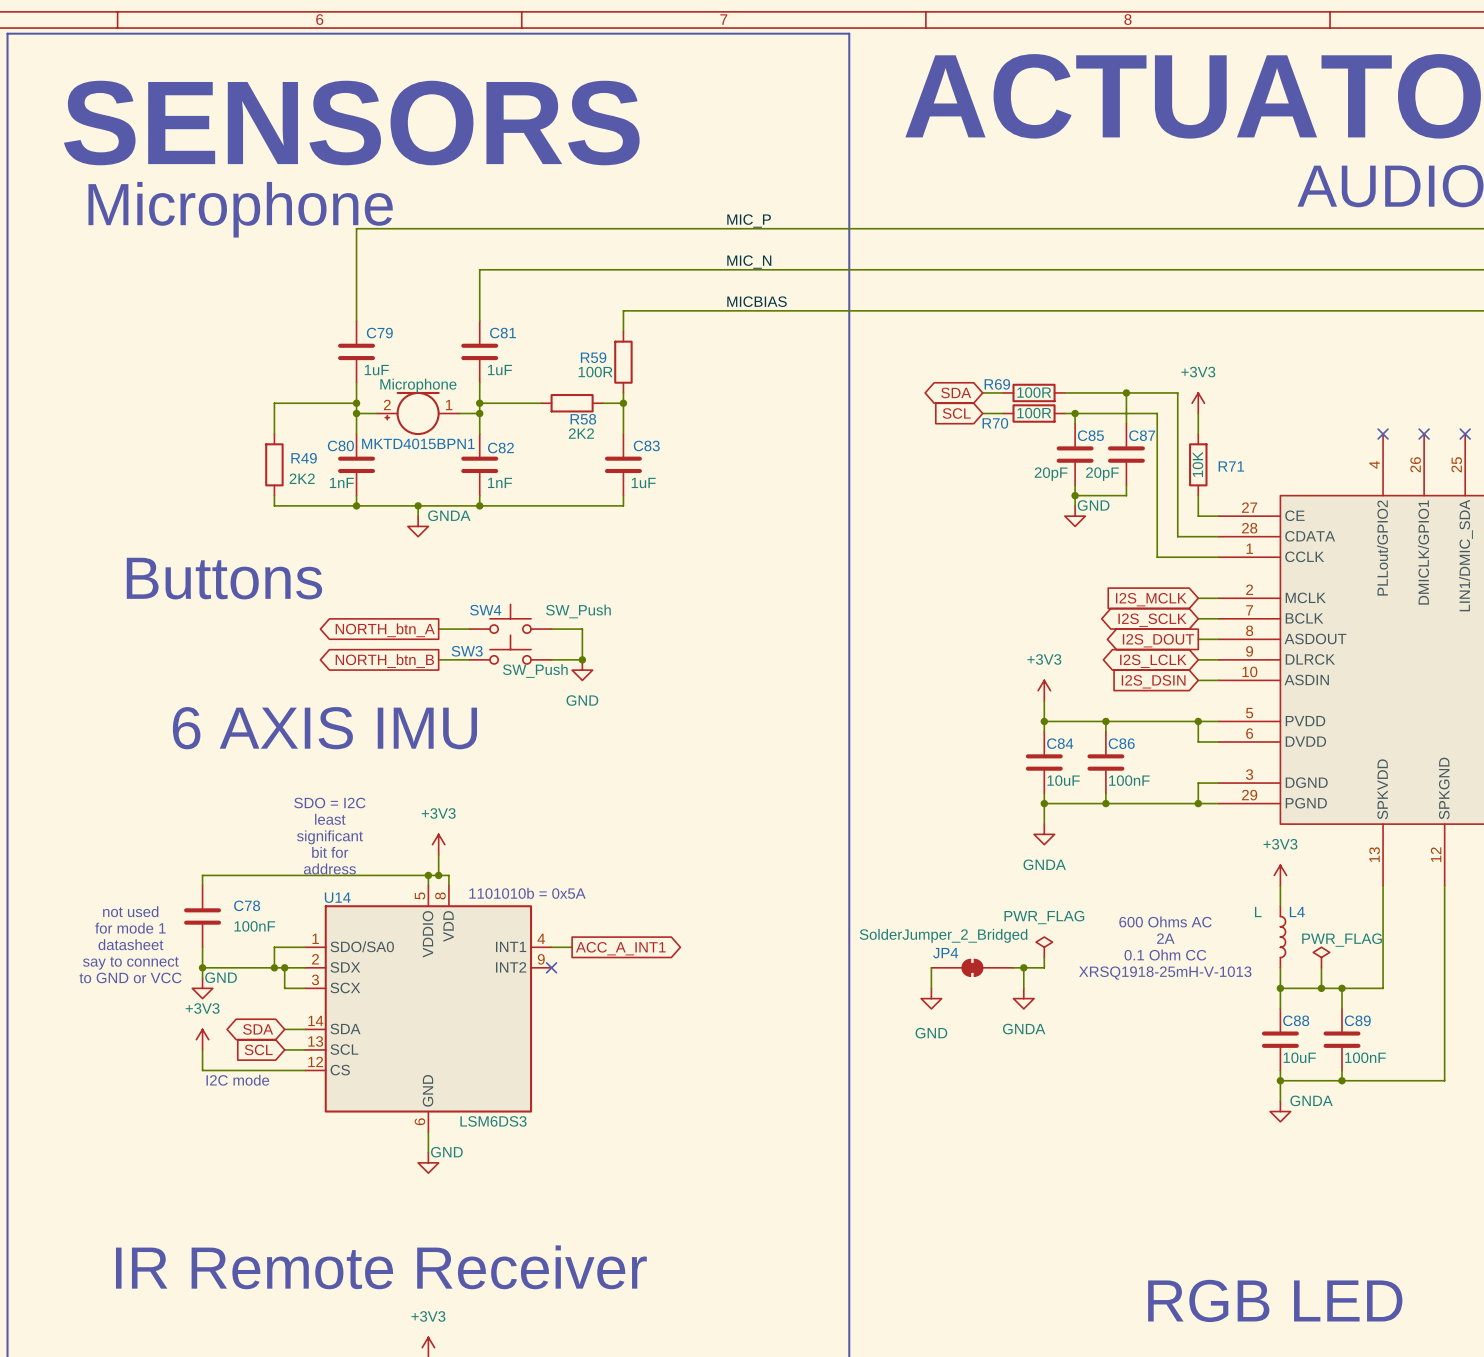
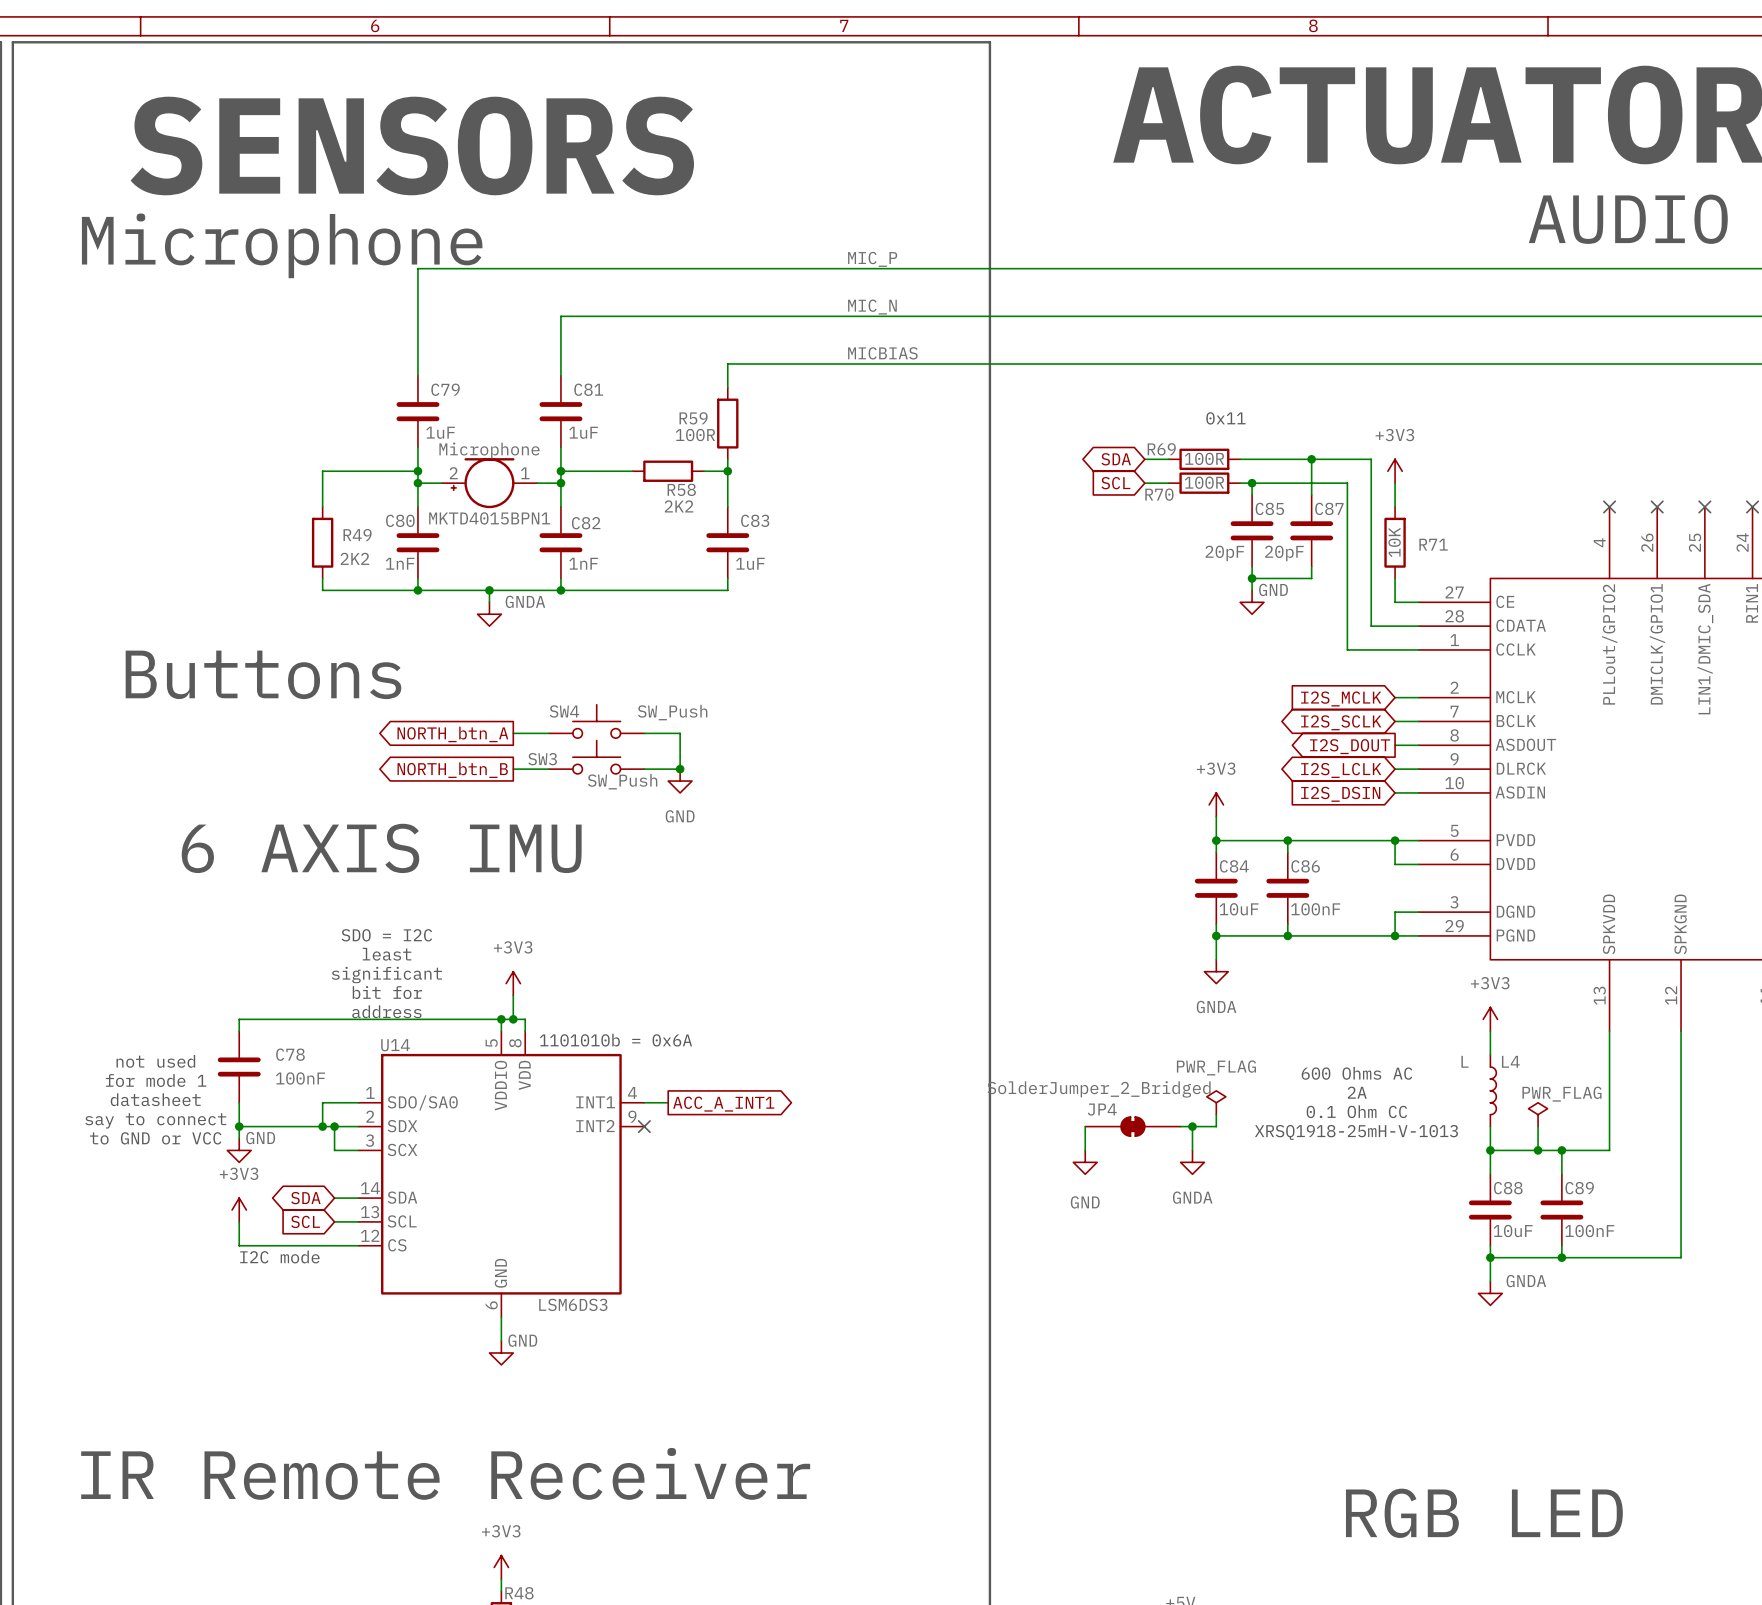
text: none -> 0x11 (1225, 418)
text: 1101010b = 0x5A (527, 893) -> 1101010b = 0x6A (615, 1040)

